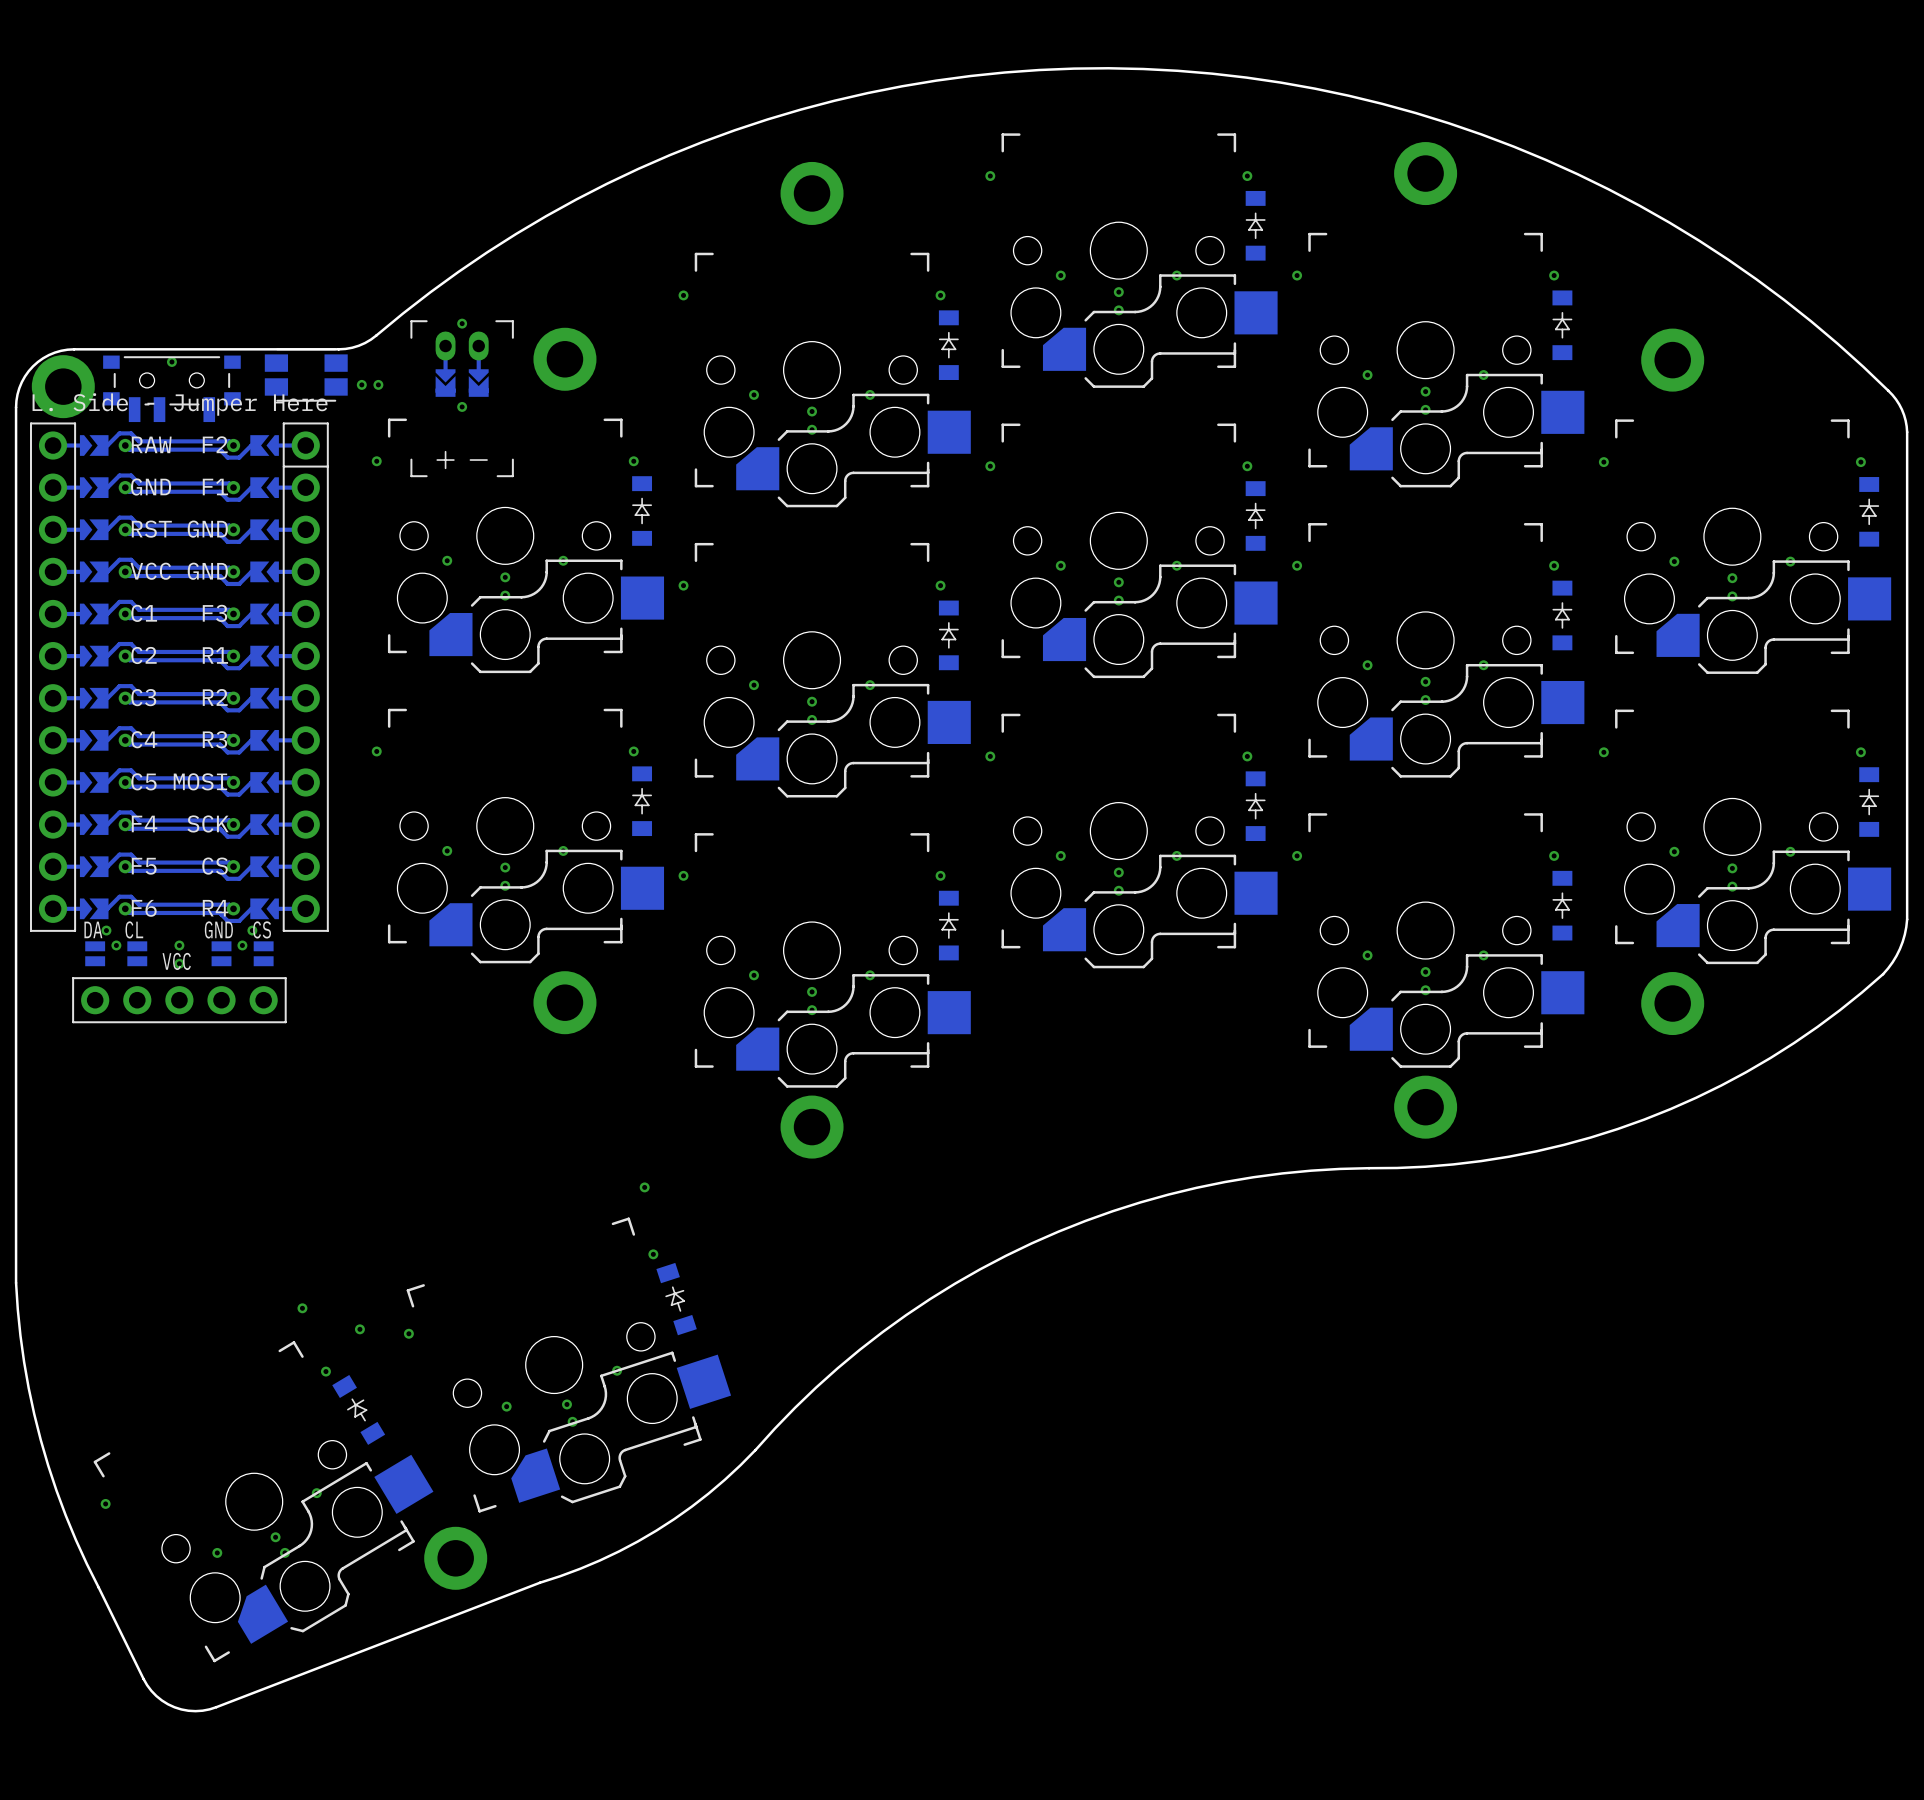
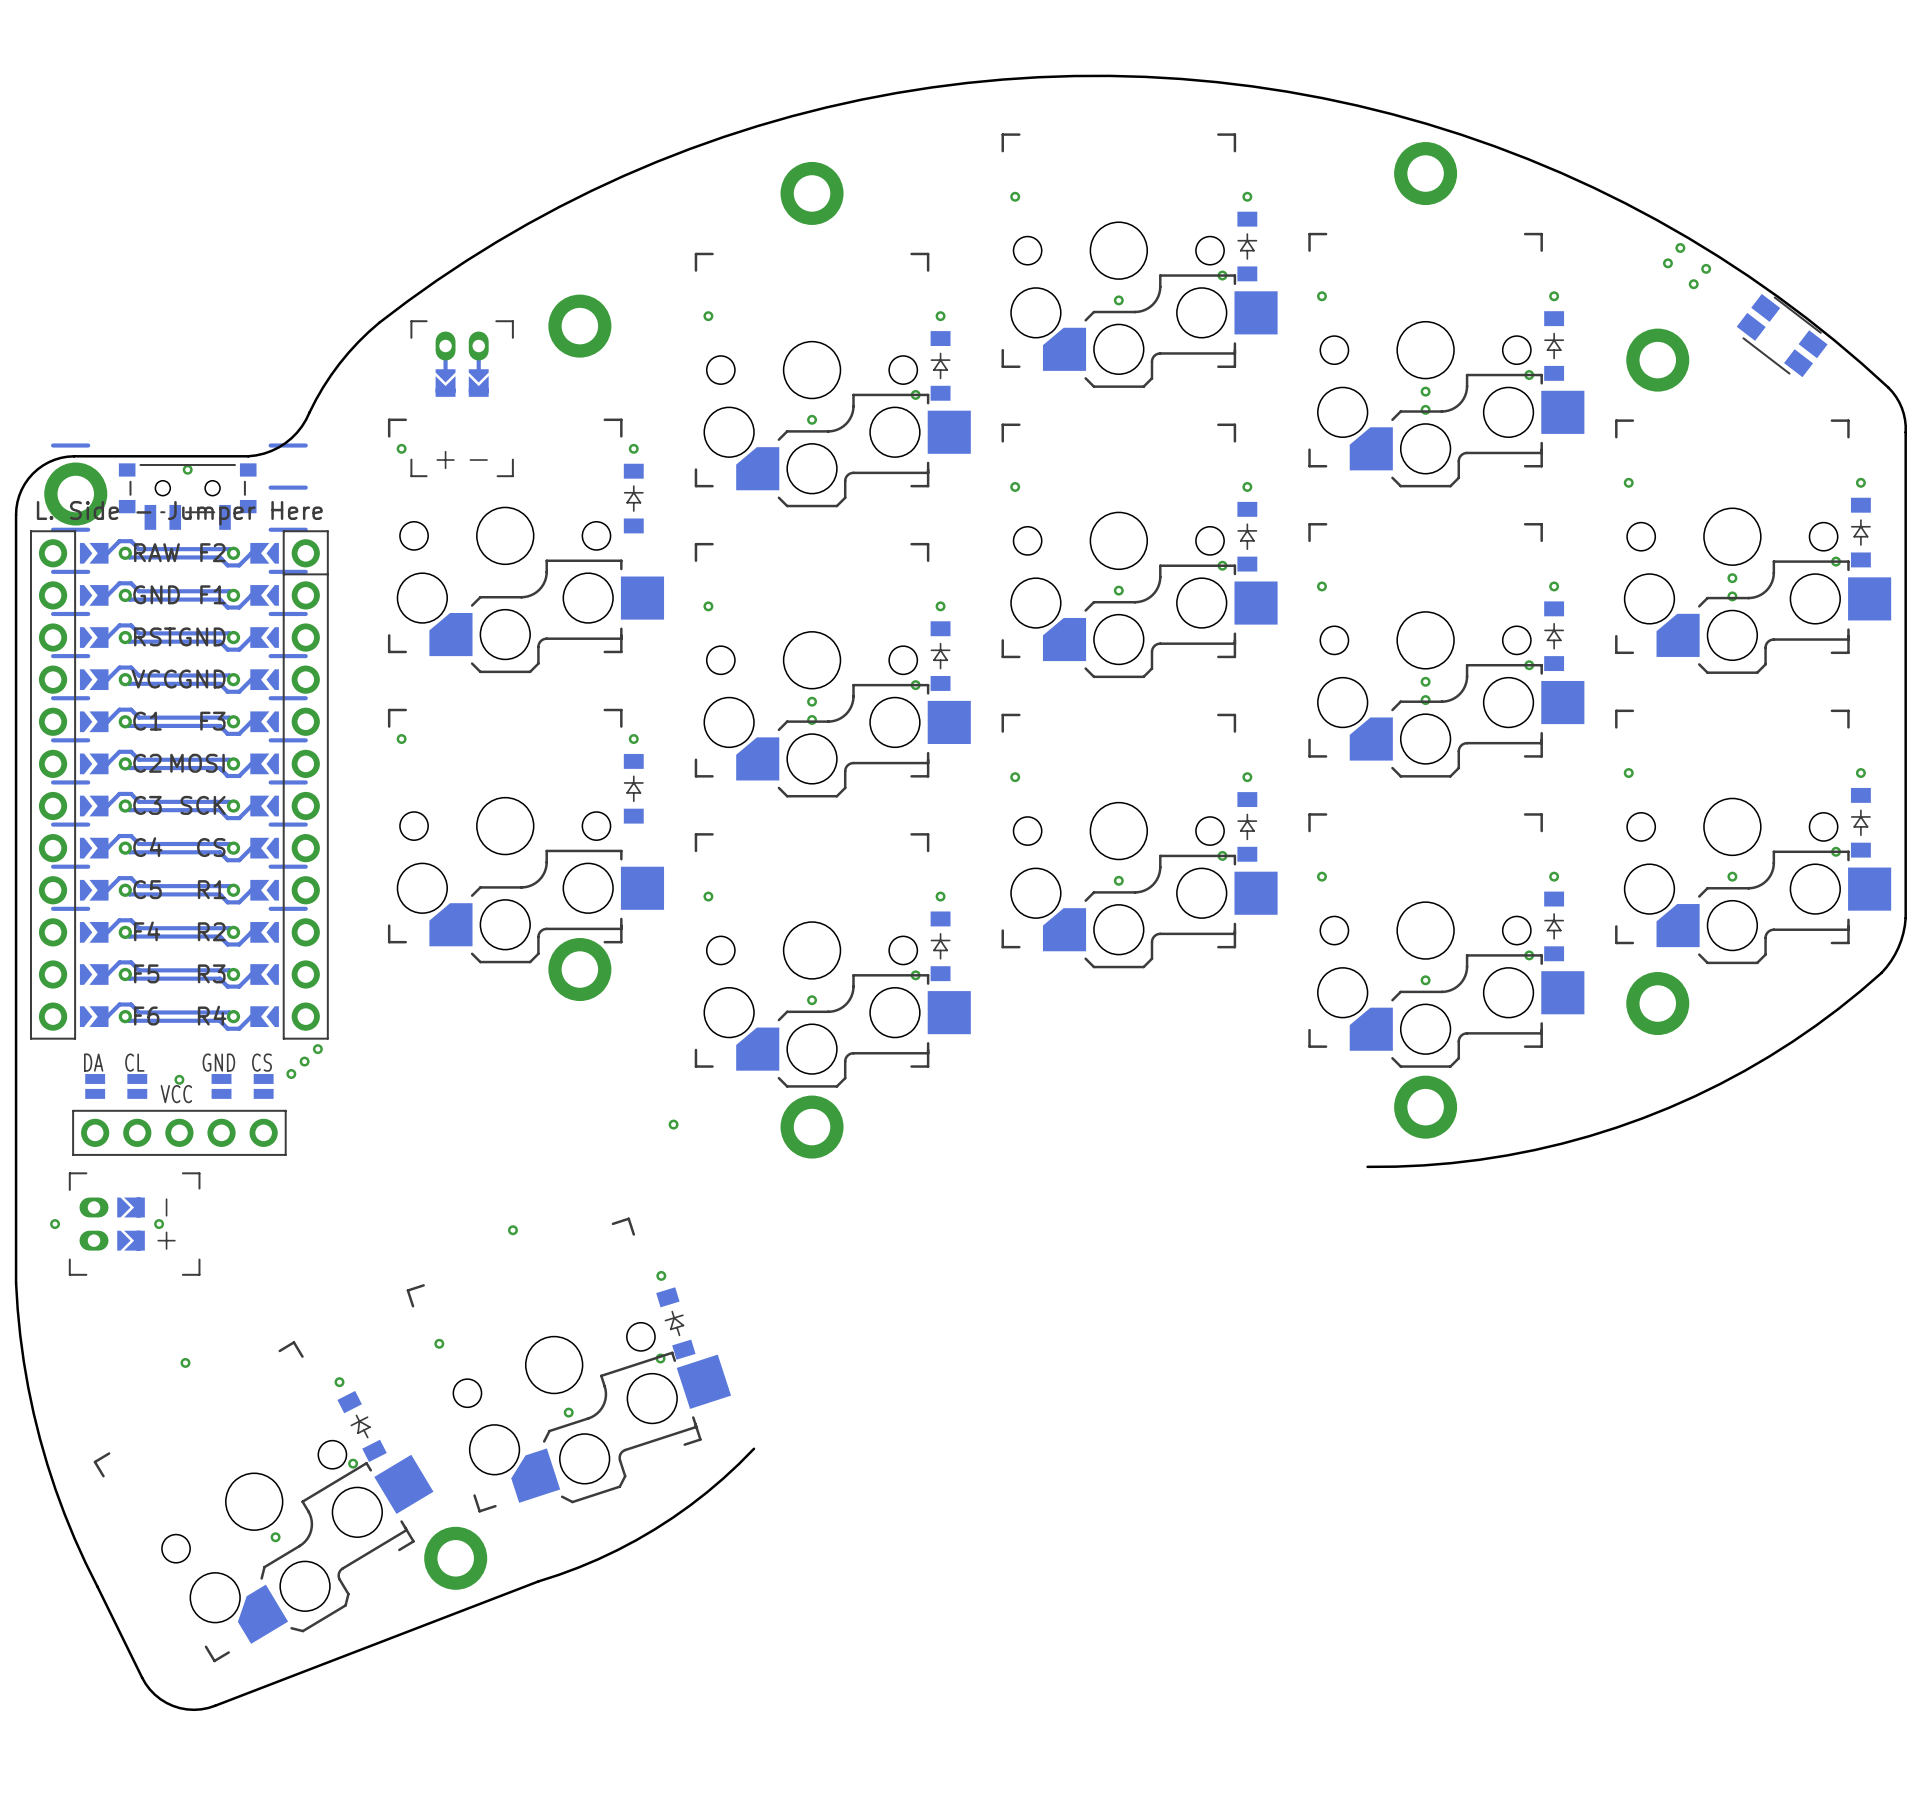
part position: (990, 176) -> (1015, 196)
part position: (1247, 176) -> (1247, 196)
part position: (1255, 225) -> (1247, 246)
part: none -> (1680, 247)
part: none -> (1667, 263)
part: none -> (1706, 268)
part: (1060, 275) -> none
part: (1176, 275) -> none
part: none -> (1222, 275)
part position: (1297, 275) -> (1321, 296)
part position: (1554, 275) -> (1554, 296)
part: none -> (1693, 284)
part: (1118, 292) -> none
part position: (683, 295) -> (708, 316)
part position: (940, 295) -> (940, 316)
part: none -> (1118, 300)
part: (1118, 310) -> none
part: (462, 323) -> none
part position: (1562, 325) -> (1554, 346)
part: none -> (1782, 335)
part position: (948, 345) -> (940, 365)
part position: (564, 359) -> (579, 326)
part position: (1672, 360) -> (1657, 360)
part: (171, 361) -> none
part: (306, 375) -> none
part: (1367, 375) -> none
part position: (1483, 375) -> (1529, 375)
part: (361, 384) -> none
part: (378, 384) -> none
part position: (63, 386) -> (75, 494)
part position: (171, 388) -> (187, 496)
part: (754, 394) -> none
part: (870, 394) -> none
part: none -> (915, 394)
part: (462, 406) -> none
part: (812, 411) -> none
part: none -> (812, 419)
part: (812, 429) -> none
track: (125, 445) (129, 449) (221, 451) -> (125, 553) (129, 557) (221, 558)
track: (233, 445) (229, 441) (138, 441) (131, 433) (119, 433) (107, 445) (100, 445) -> (233, 553) (229, 549) (138, 549) (131, 541) (119, 541) (107, 553) (100, 553)
track: (258, 445) (251, 445) (239, 457) (227, 457) (221, 451) -> (258, 553) (251, 553) (239, 565) (227, 565) (221, 559)
part position: (376, 461) -> (401, 448)
part position: (633, 461) -> (633, 448)
part position: (1603, 462) -> (1628, 482)
part position: (1860, 462) -> (1860, 482)
part position: (990, 466) -> (1015, 486)
part position: (1247, 466) -> (1247, 486)
part: none -> (187, 469)
track: (125, 487) (129, 491) (221, 493) -> (125, 595) (129, 599) (221, 601)
track: (233, 487) (229, 483) (138, 483) (131, 475) (119, 475) (107, 487) (100, 487) -> (233, 595) (229, 591) (138, 591) (131, 583) (119, 583) (107, 595) (100, 595)
track: (258, 487) (251, 487) (239, 499) (227, 499) (221, 493) -> (258, 595) (251, 595) (239, 607) (227, 607) (221, 601)
part position: (642, 511) -> (633, 498)
part position: (1869, 511) -> (1860, 532)
board edge: (16, 515) (17, 394) (28, 371) (48, 355) (74, 349) (338, 349) (352, 347) (370, 339) (430, 292) (516, 233) (607, 183) (670, 155) (767, 119) (868, 93) (936, 80) (1039, 70) (1108, 68) (1177, 70) (1280, 82) (1348, 95) (1415, 113) (1481, 134) (1545, 159) (1608, 189) (1669, 222) (1727, 259) (1784, 299) (1837, 343) (1892, 394) (1901, 409) (1907, 432) (1907, 919) (1902, 941) (1892, 962) (1883, 974) (1839, 1010) (1770, 1058) (1696, 1097) (1617, 1129) (1536, 1151) (1453, 1164) (1311, 1170) (1224, 1182) (1140, 1202) (1058, 1231) (1005, 1255) (955, 1283) (882, 1332) (815, 1387) (724, 1479) (691, 1506) (638, 1541) (580, 1568) (216, 1707) (202, 1710) (188, 1710) (174, 1707) (156, 1696) (147, 1685) (75, 1539) (56, 1490) (34, 1414) (20, 1335) (16, 1282) -> (754, 1448) (707, 1492) (672, 1517) (636, 1540) (598, 1559) (215, 1705) (201, 1709) (179, 1708) (160, 1699) (145, 1683) (85, 1562) (64, 1514) (47, 1464) (33, 1413) (23, 1361) (16, 1282)
board edge: none -> (16, 515) (19, 495) (28, 478) (43, 465) (61, 457) (248, 456) (263, 453) (278, 447) (291, 438) (302, 426) (331, 375) (348, 352) (368, 332) (436, 280) (496, 241) (591, 190) (689, 148) (791, 116) (861, 99) (967, 82) (1074, 76) (1145, 76) (1252, 86) (1322, 98) (1426, 123) (1528, 159) (1593, 187) (1688, 237) (1777, 296) (1861, 363) (1892, 392) (1901, 407) (1905, 426) (1905, 918) (1903, 933) (1895, 954) (1886, 967) (1838, 1008) (1792, 1041) (1744, 1070) (1668, 1107) (1589, 1136) (1507, 1155) (1423, 1165) (1367, 1166)
part position: (1255, 515) -> (1247, 536)
track: (125, 529) (129, 533) (221, 535) -> (125, 637) (129, 641) (221, 643)
track: (233, 529) (229, 525) (138, 525) (131, 517) (119, 517) (107, 529) (100, 529) -> (233, 637) (229, 633) (138, 633) (131, 625) (119, 625) (107, 637) (100, 637)
track: (258, 529) (251, 529) (239, 541) (227, 541) (221, 535) -> (258, 637) (251, 637) (239, 649) (227, 649) (221, 643)
part: (447, 560) -> none
part: (563, 560) -> none
part: (1674, 561) -> none
part position: (1790, 561) -> (1836, 561)
part: (1060, 565) -> none
part: (1176, 565) -> none
part: none -> (1222, 565)
part position: (1297, 565) -> (1321, 586)
part position: (1554, 565) -> (1554, 586)
track: (125, 571) (129, 576) (221, 577) -> (125, 679) (129, 683) (221, 685)
track: (233, 571) (229, 567) (138, 567) (131, 559) (119, 559) (107, 571) (100, 571) -> (233, 679) (229, 675) (138, 675) (131, 667) (119, 667) (107, 679) (100, 679)
track: (258, 571) (251, 571) (239, 583) (227, 583) (221, 577) -> (258, 679) (251, 679) (239, 691) (227, 691) (221, 685)
part: (505, 577) -> none
part: (1118, 582) -> none
part position: (683, 585) -> (708, 606)
part position: (940, 585) -> (940, 606)
part: none -> (1118, 590)
part: (505, 595) -> none
part: (1118, 600) -> none
track: (125, 613) (129, 618) (221, 619) -> (125, 721) (129, 725) (221, 727)
track: (233, 613) (229, 609) (138, 609) (131, 601) (119, 601) (107, 613) (100, 613) -> (233, 721) (229, 717) (138, 717) (131, 709) (119, 709) (107, 721) (100, 721)
track: (258, 613) (251, 613) (239, 626) (227, 626) (221, 619) -> (258, 721) (251, 721) (239, 733) (227, 733) (221, 727)
part position: (1562, 615) -> (1554, 636)
part position: (948, 635) -> (940, 656)
track: (125, 656) (129, 660) (221, 661) -> (125, 763) (129, 768) (221, 769)
track: (233, 656) (229, 651) (138, 651) (131, 644) (119, 644) (107, 656) (100, 656) -> (233, 763) (229, 759) (138, 759) (131, 751) (119, 751) (107, 763) (100, 763)
track: (258, 656) (251, 656) (239, 668) (227, 668) (221, 661) -> (258, 763) (251, 763) (239, 776) (227, 776) (221, 769)
part: (1367, 665) -> none
part position: (1483, 665) -> (1529, 665)
part: (179, 677) -> none
part: (754, 685) -> none
part position: (870, 685) -> (915, 685)
track: (125, 698) (129, 702) (221, 703) -> (125, 806) (129, 810) (221, 811)
track: (233, 698) (229, 694) (138, 694) (131, 686) (119, 686) (107, 698) (100, 698) -> (233, 806) (229, 801) (138, 801) (131, 793) (119, 793) (107, 806) (100, 806)
track: (258, 698) (251, 698) (239, 710) (227, 710) (221, 704) -> (258, 806) (251, 806) (239, 818) (227, 818) (221, 811)
track: (125, 740) (129, 744) (221, 745) -> (125, 848) (129, 852) (221, 853)
track: (233, 740) (229, 736) (138, 736) (131, 728) (119, 728) (107, 740) (100, 740) -> (233, 848) (229, 843) (138, 843) (131, 836) (119, 836) (107, 848) (100, 848)
track: (258, 740) (251, 740) (239, 752) (227, 752) (221, 746) -> (258, 848) (251, 848) (239, 860) (227, 860) (221, 853)
part position: (376, 751) -> (401, 739)
part position: (633, 751) -> (633, 739)
part position: (1603, 752) -> (1628, 773)
part position: (1860, 752) -> (1860, 773)
part position: (990, 756) -> (1015, 777)
part position: (1247, 756) -> (1247, 777)
track: (125, 782) (129, 786) (221, 788) -> (125, 890) (129, 894) (221, 895)
track: (233, 782) (229, 778) (138, 778) (131, 770) (119, 770) (107, 782) (100, 782) -> (233, 890) (229, 886) (138, 886) (131, 878) (119, 878) (107, 890) (100, 890)
track: (258, 782) (251, 782) (239, 794) (227, 794) (221, 788) -> (258, 890) (251, 890) (239, 902) (227, 902) (221, 896)
part: none -> (179, 784)
part position: (642, 801) -> (633, 788)
part position: (1869, 802) -> (1860, 822)
part position: (1255, 806) -> (1247, 826)
track: (125, 824) (129, 828) (221, 830) -> (125, 932) (129, 936) (221, 938)
track: (233, 824) (229, 820) (138, 820) (131, 812) (119, 812) (107, 824) (100, 824) -> (233, 932) (229, 928) (138, 928) (131, 920) (119, 920) (107, 932) (100, 932)
track: (258, 824) (251, 824) (239, 836) (227, 836) (221, 830) -> (258, 932) (251, 932) (239, 944) (227, 944) (221, 938)
part: (447, 850) -> none
part: (563, 850) -> none
part: (1674, 851) -> none
part: (1790, 851) -> none
part: none -> (1836, 851)
part: (1060, 855) -> none
part: (1176, 855) -> none
part: none -> (1222, 855)
part position: (1297, 855) -> (1321, 876)
part position: (1554, 855) -> (1554, 876)
track: (125, 866) (129, 870) (221, 872) -> (125, 974) (129, 978) (221, 980)
track: (233, 866) (229, 862) (138, 862) (131, 854) (119, 854) (107, 866) (100, 866) -> (233, 974) (229, 970) (138, 970) (131, 962) (119, 962) (107, 974) (100, 974)
track: (258, 866) (251, 866) (239, 878) (227, 878) (221, 872) -> (258, 974) (251, 974) (239, 986) (227, 986) (221, 980)
part: (505, 867) -> none
part: (1732, 868) -> none
part: (1118, 872) -> none
part position: (683, 875) -> (708, 896)
part position: (940, 875) -> (940, 896)
part: none -> (1732, 876)
part: none -> (1118, 880)
part: (505, 885) -> none
part: (1732, 886) -> none
part: (1118, 890) -> none
part position: (1562, 905) -> (1554, 926)
track: (125, 908) (129, 912) (221, 914) -> (125, 1016) (129, 1020) (221, 1022)
track: (233, 908) (229, 904) (138, 904) (131, 896) (119, 896) (107, 908) (100, 908) -> (233, 1016) (229, 1012) (138, 1012) (131, 1004) (119, 1004) (107, 1016) (100, 1016)
track: (258, 908) (251, 908) (239, 920) (227, 920) (221, 914) -> (258, 1016) (251, 1016) (239, 1028) (227, 1028) (221, 1022)
part position: (948, 925) -> (940, 946)
part: (106, 930) -> none
part: (252, 930) -> none
part: (116, 945) -> none
part: (179, 945) -> none
part: (242, 945) -> none
part: (1367, 955) -> none
part: (1483, 955) -> none
part: none -> (1529, 955)
part: (179, 963) -> none
part: (1425, 972) -> none
part: (754, 975) -> none
part: (870, 975) -> none
part: none -> (915, 975)
part: none -> (1425, 980)
part position: (179, 982) -> (179, 1114)
part: (1425, 990) -> none
part: (812, 991) -> none
part: none -> (812, 1000)
part position: (564, 1002) -> (579, 969)
part position: (1672, 1003) -> (1657, 1003)
part: (812, 1010) -> none
part: none -> (317, 1049)
part: none -> (304, 1061)
part: none -> (291, 1073)
part: none -> (179, 1079)
part: none -> (673, 1124)
part: (644, 1187) -> none
part: none -> (55, 1224)
part: none -> (134, 1224)
part: none -> (159, 1224)
part: none -> (512, 1230)
part position: (653, 1254) -> (661, 1275)
part: (676, 1299) -> none
part: (302, 1308) -> none
part: none -> (675, 1323)
part: (359, 1329) -> none
part position: (408, 1333) -> (439, 1343)
part: none -> (660, 1358)
part: none -> (185, 1362)
part: (617, 1370) -> none
part position: (325, 1371) -> (339, 1382)
part: (566, 1404) -> none
part: (506, 1406) -> none
part: (358, 1409) -> none
part: none -> (568, 1412)
part: (572, 1421) -> none
part: none -> (362, 1426)
part position: (316, 1493) -> (353, 1463)
part: (105, 1503) -> none
part: (217, 1552) -> none
part: (284, 1552) -> none

